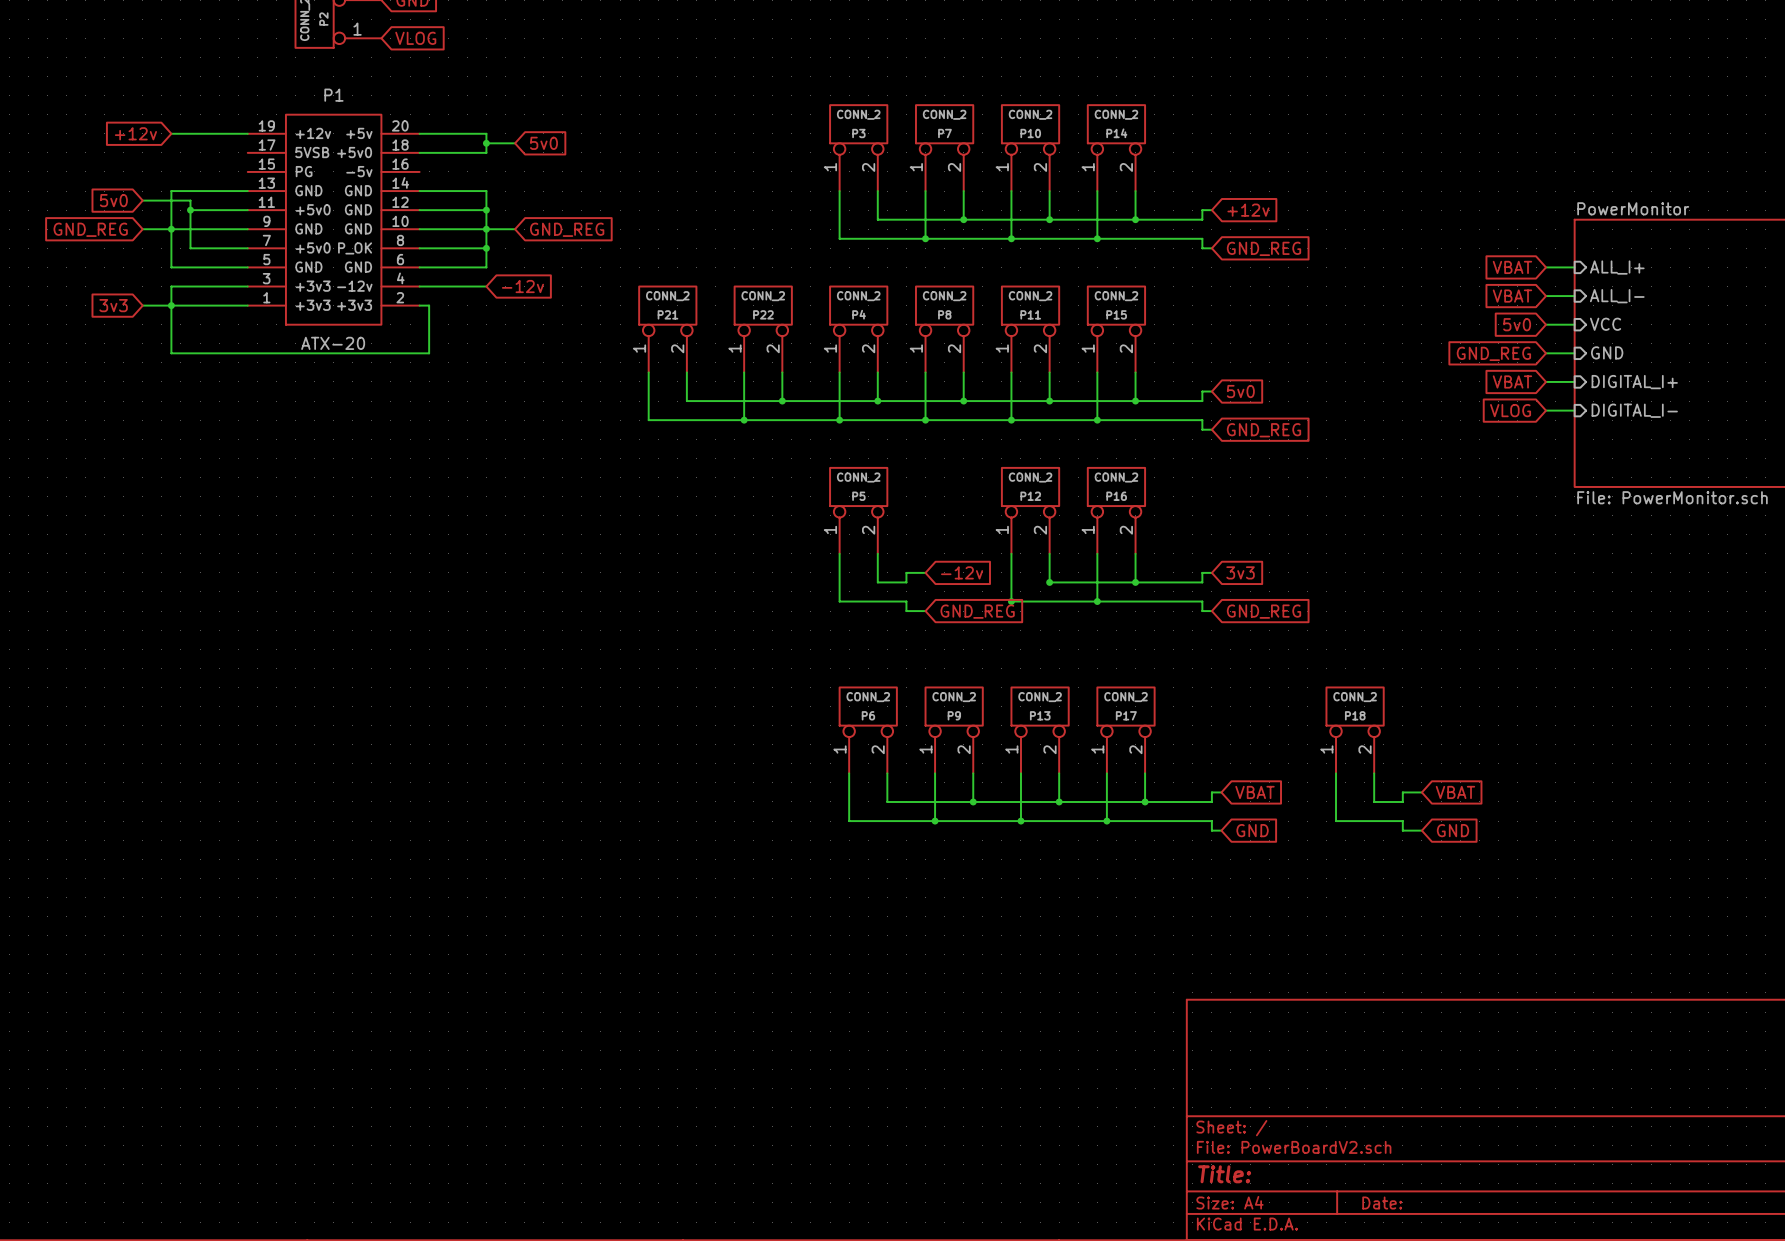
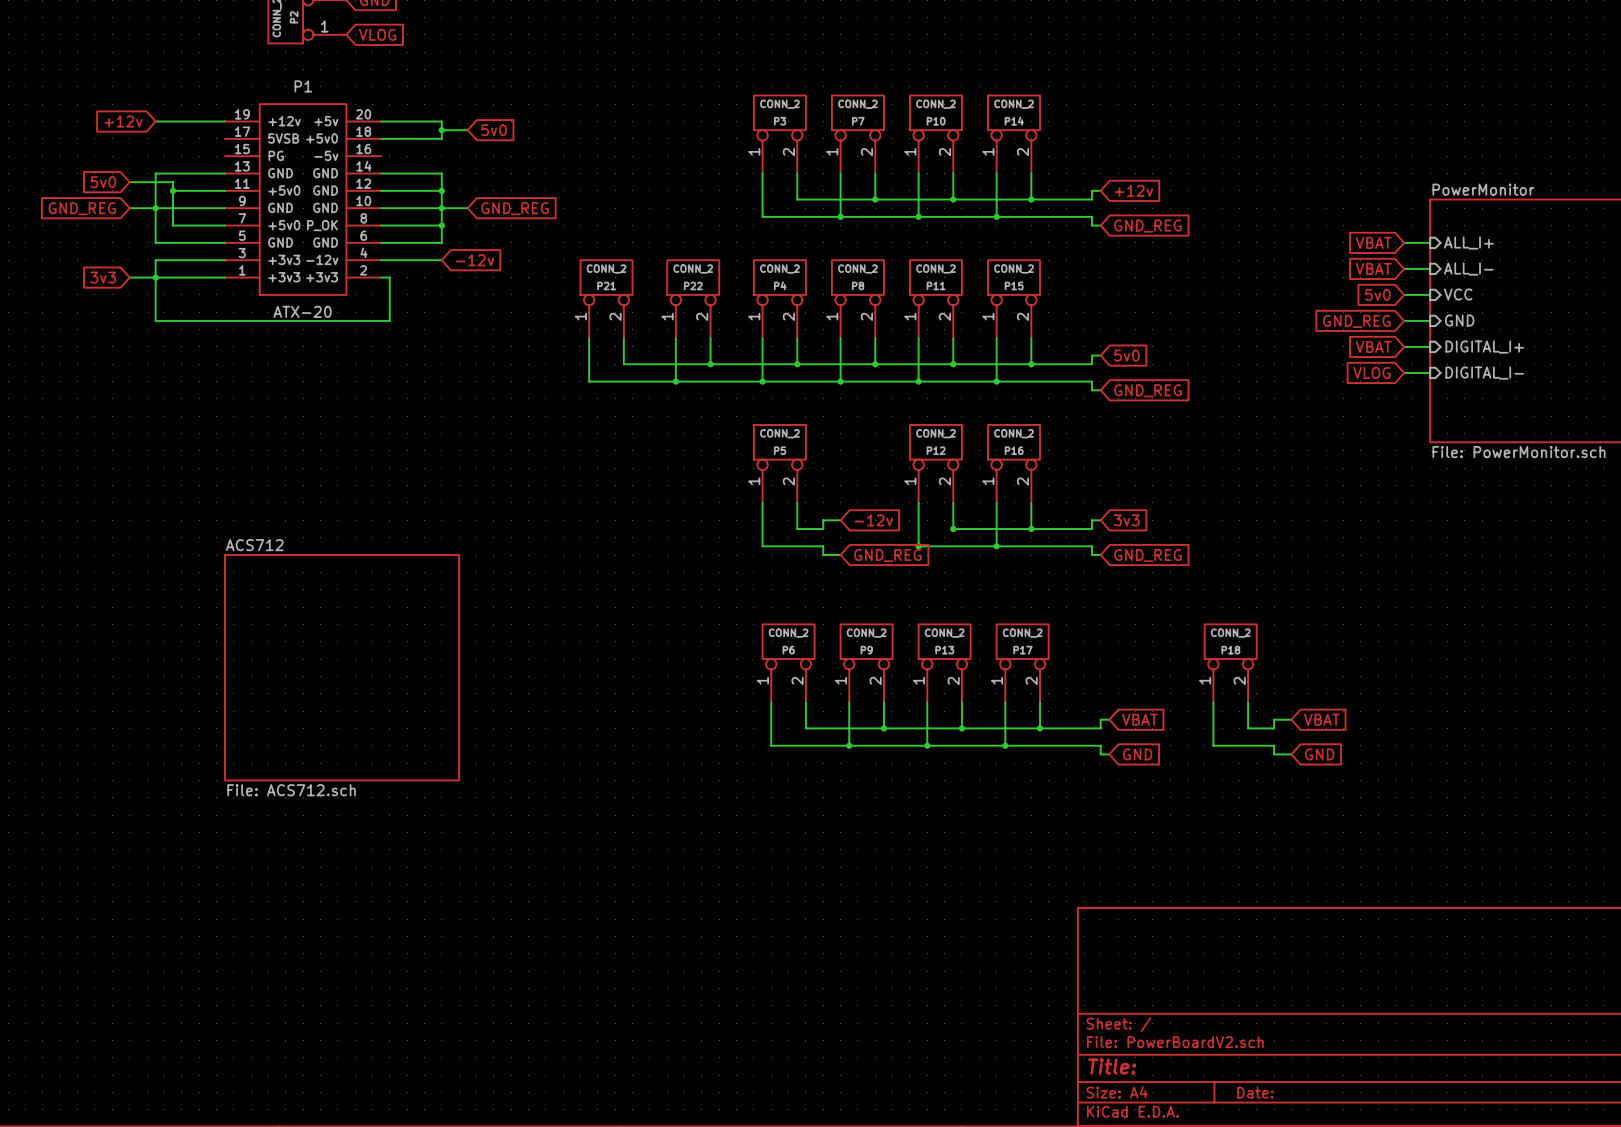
sheet ACS712: none -> File: ACS712.sch (342, 667)

